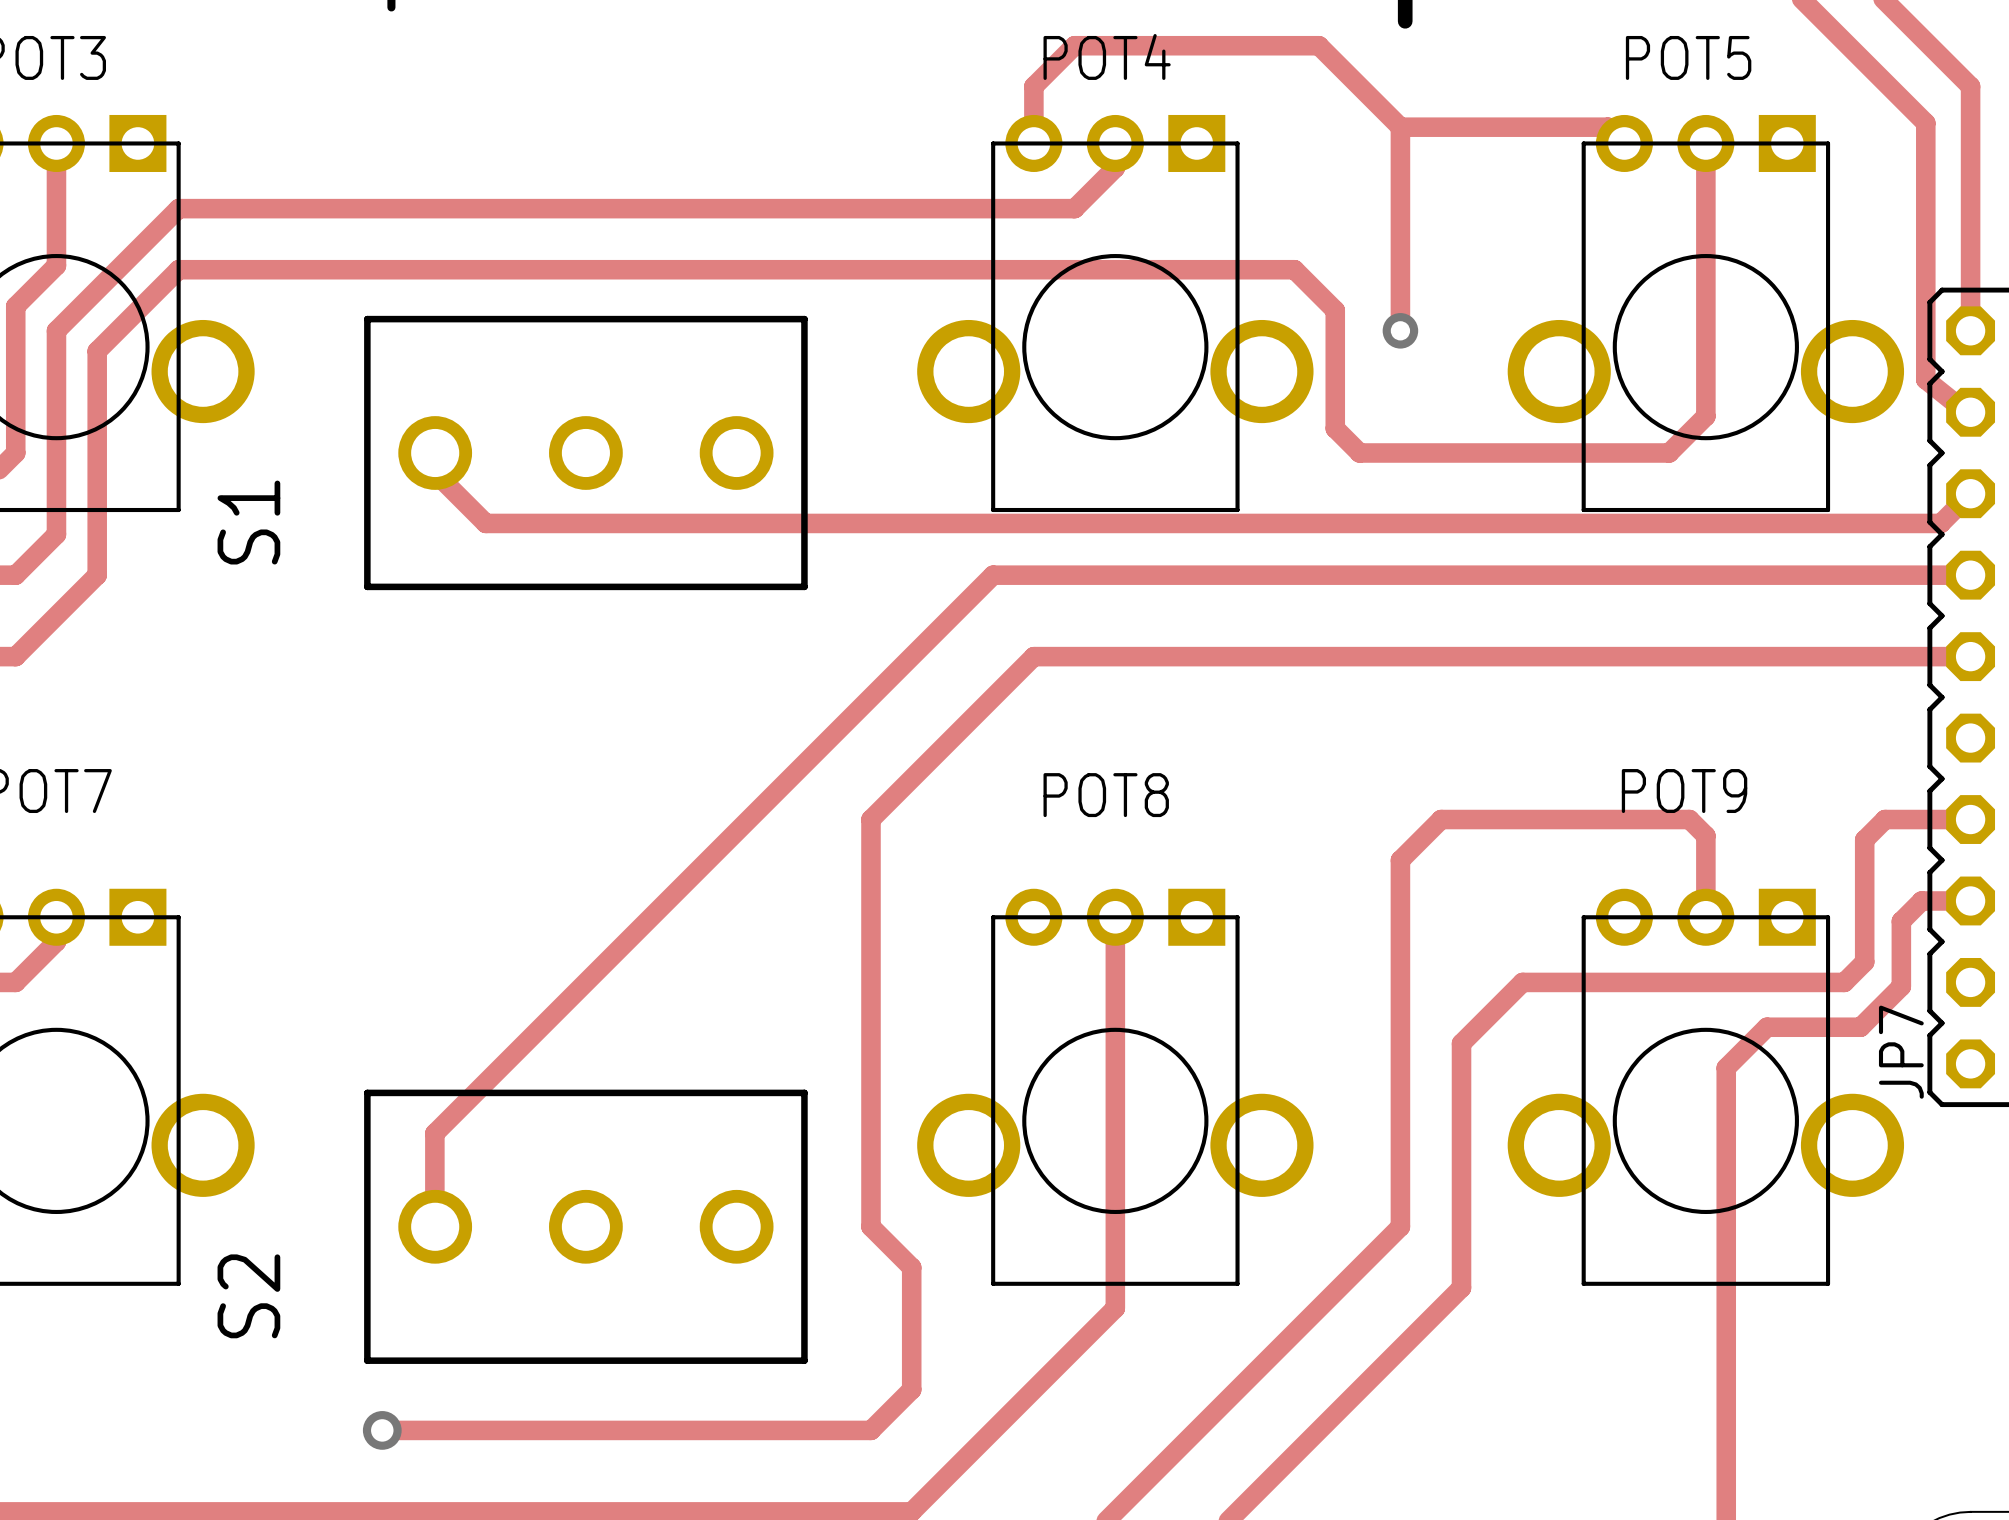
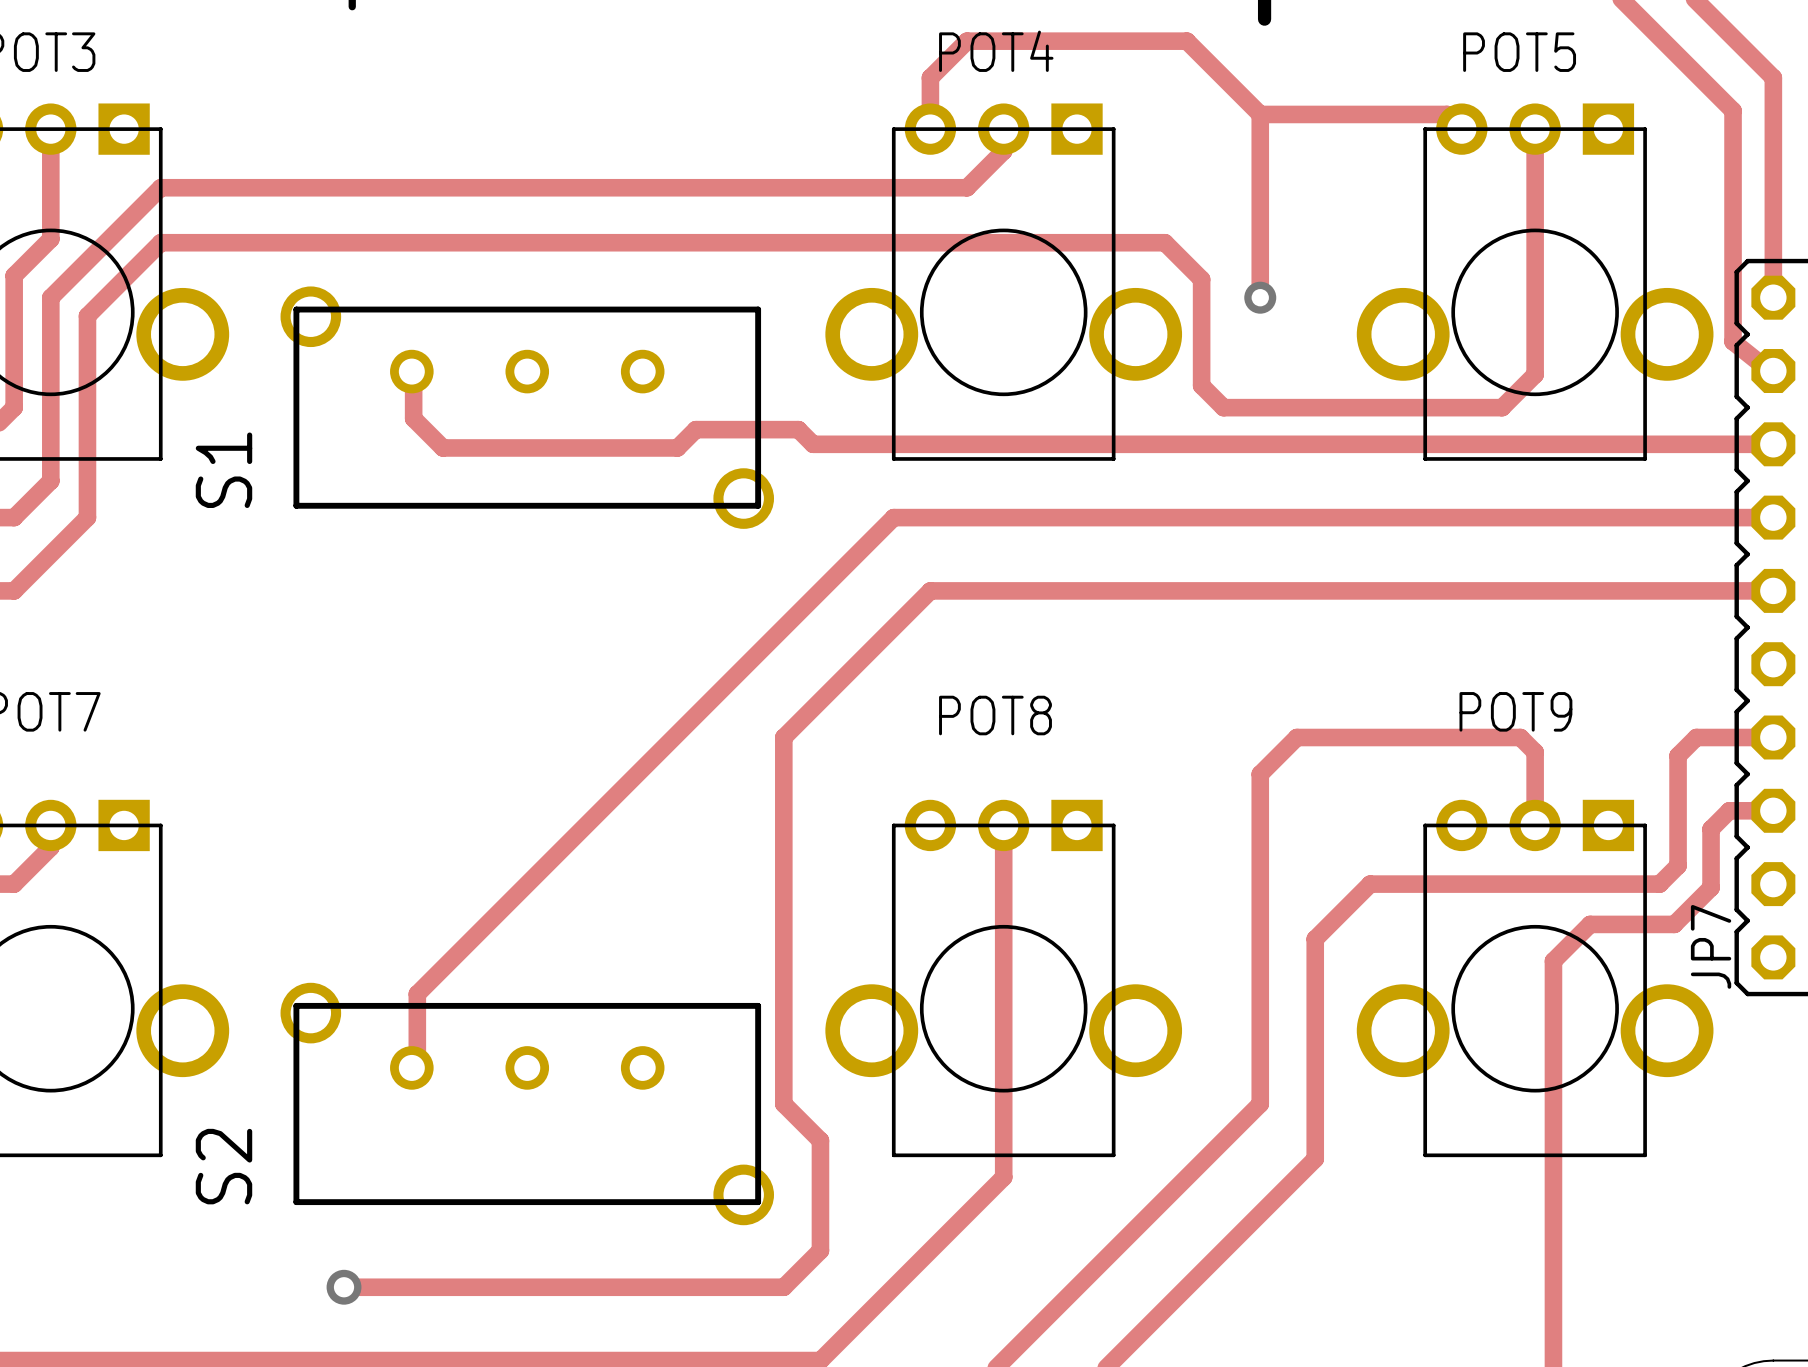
S1 footprint: [364, 315, 808, 591] -> [280, 286, 775, 529]
track: (435, 452) (435, 472) (485, 523) (1940, 523) (1970, 493) -> (411, 371) (413, 373) (413, 418) (442, 447) (677, 447) (695, 429) (798, 429) (813, 444) (1773, 444)
S2 footprint: [364, 1089, 808, 1364] -> [280, 982, 775, 1226]
track: (463, 1104) (434, 1133) (434, 1226) -> (417, 994) (417, 1062) (411, 1067)

